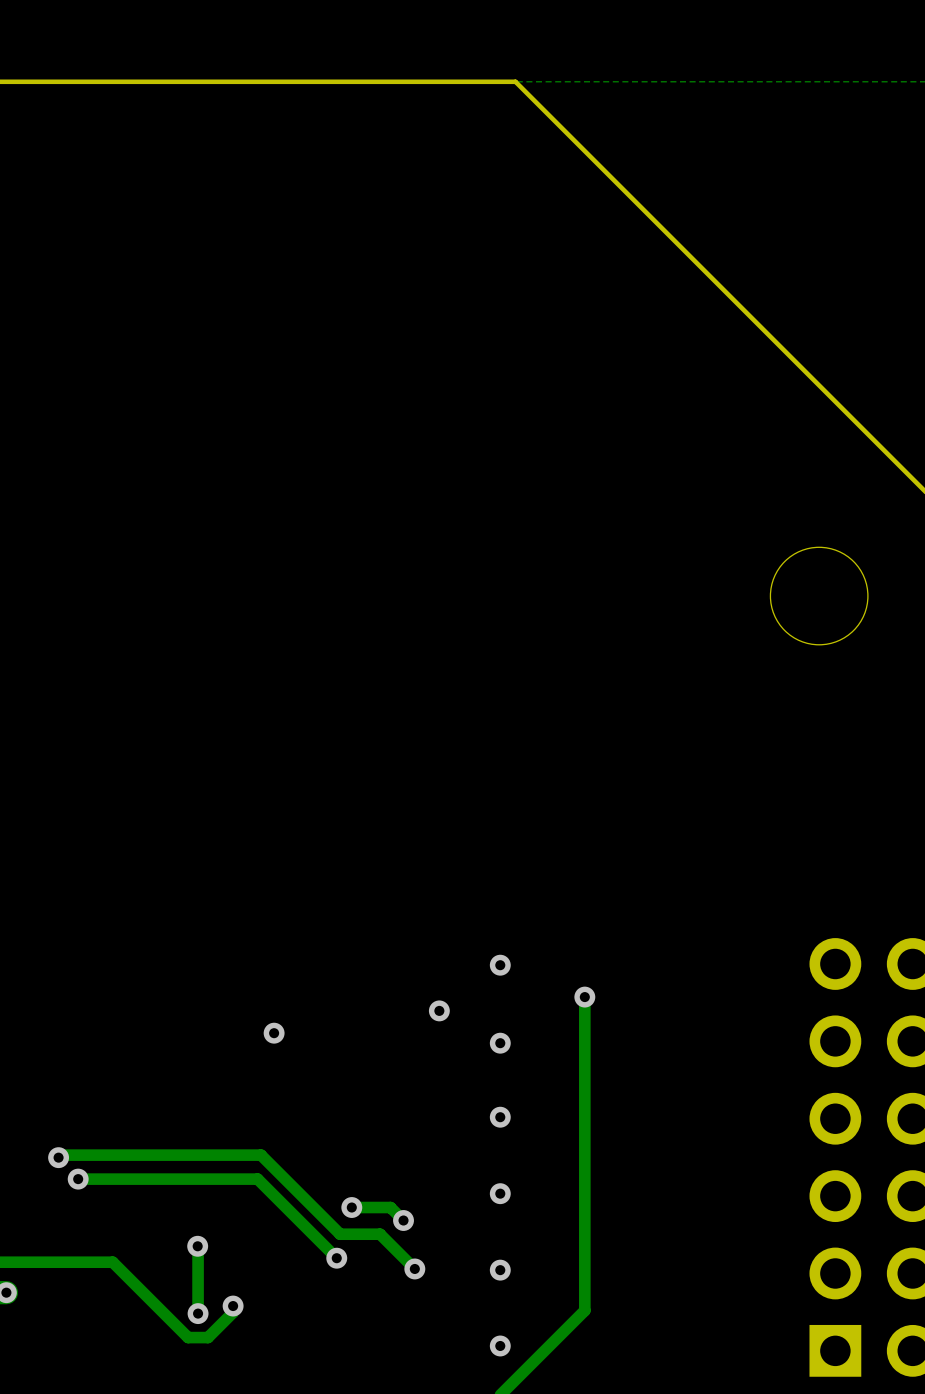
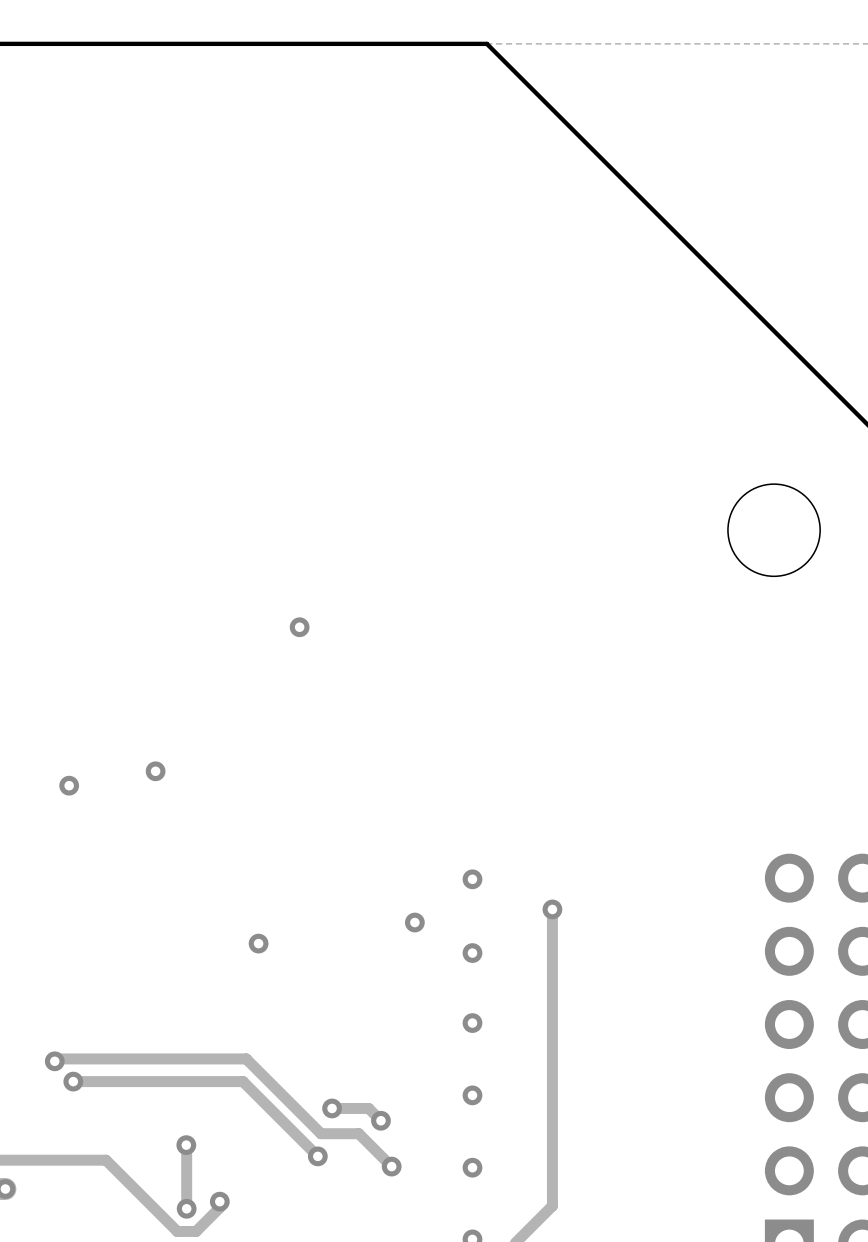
via: none -> (299, 627)
via: none -> (155, 771)
via: none -> (69, 785)

